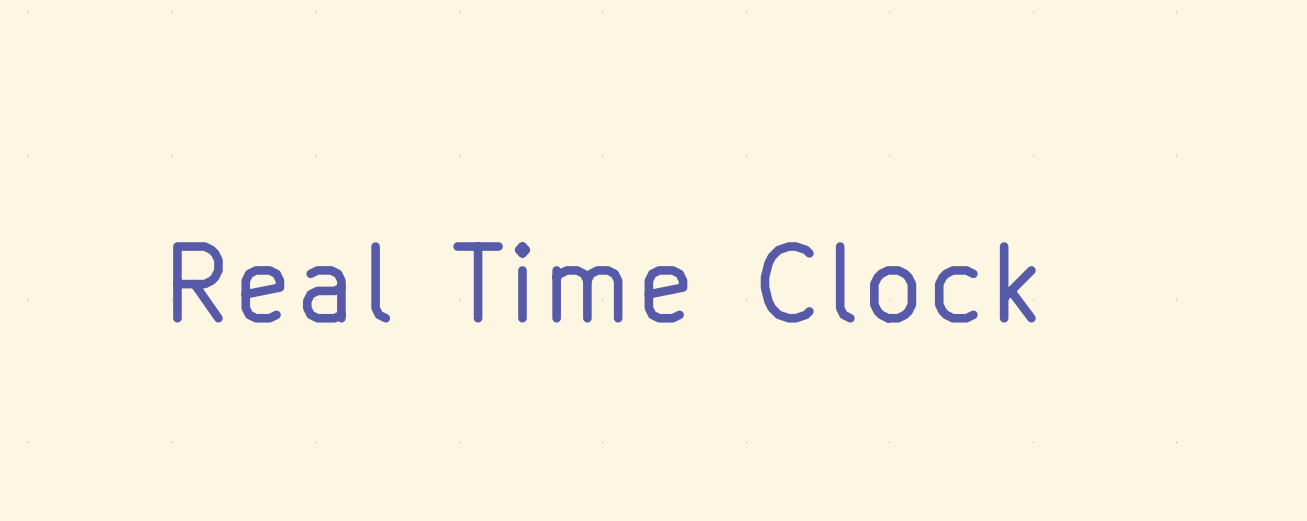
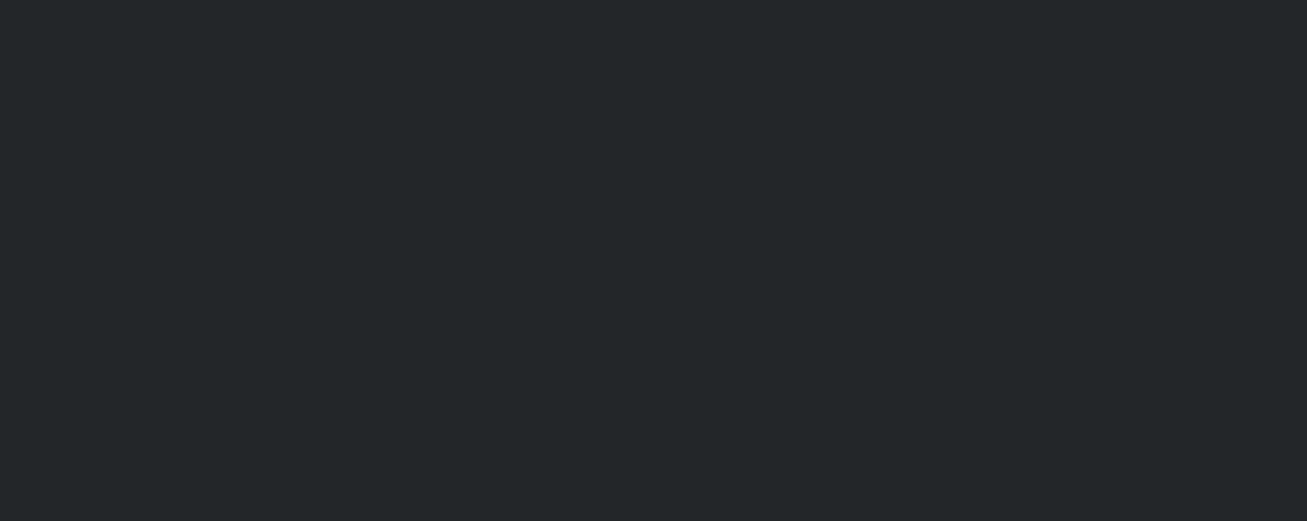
text: Real Time Clock (604, 282) -> none

